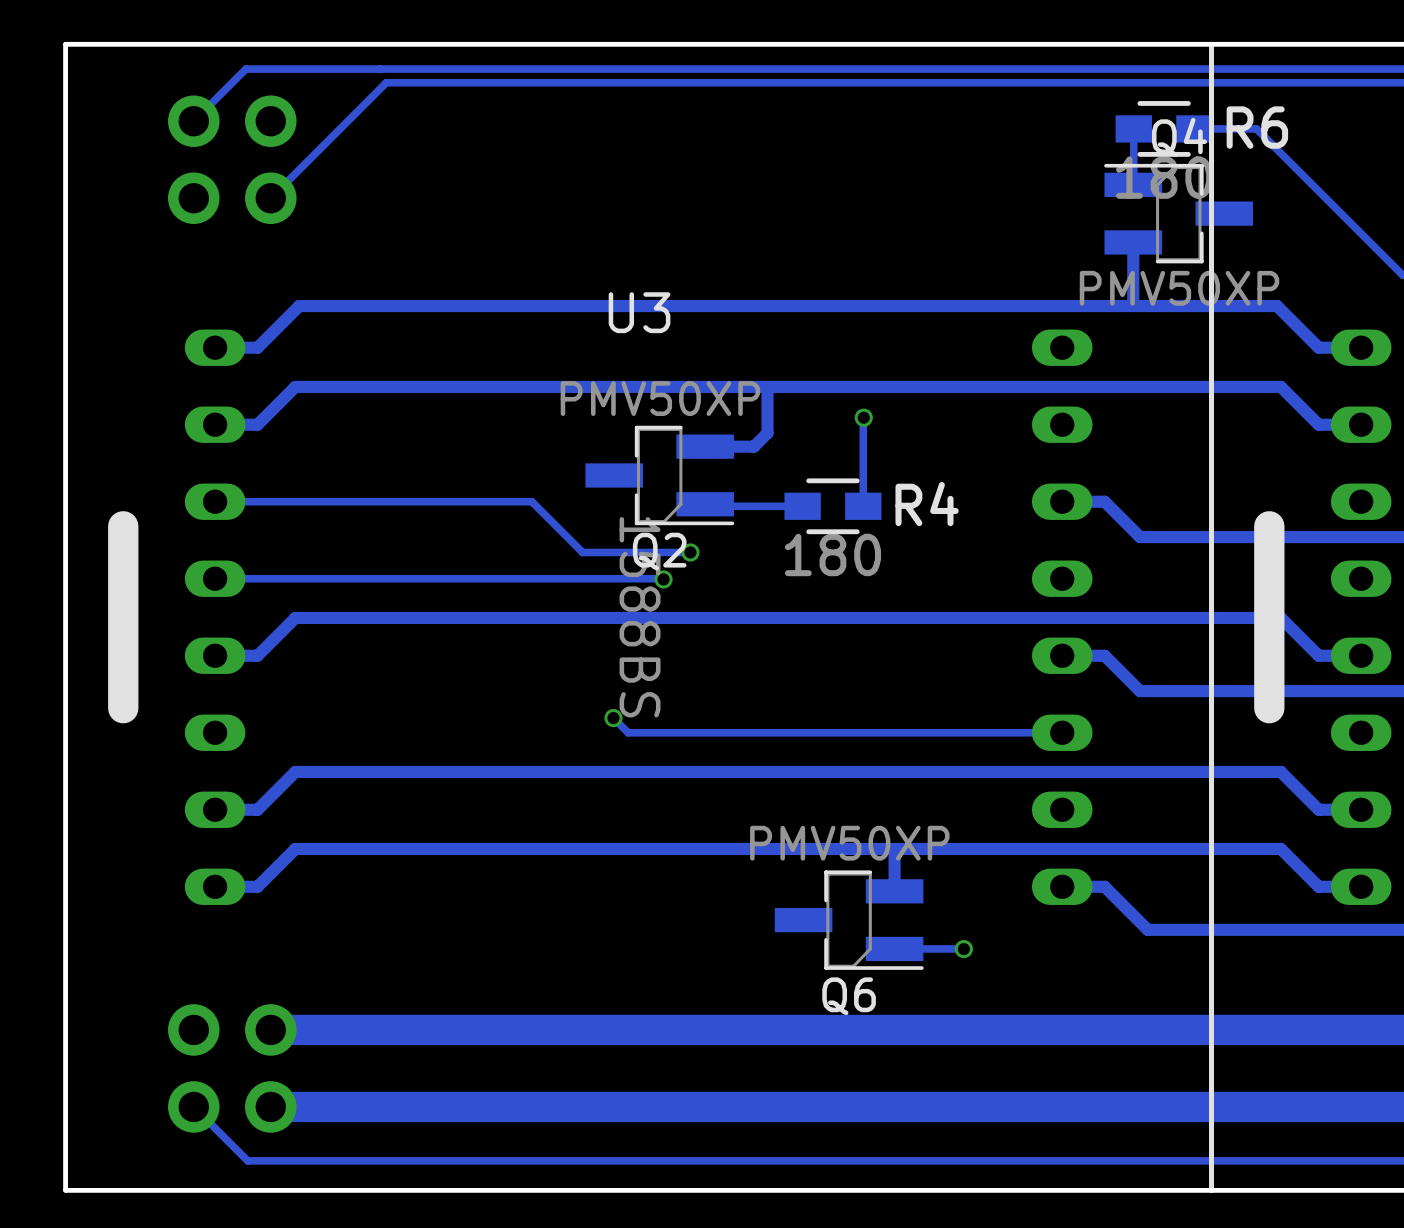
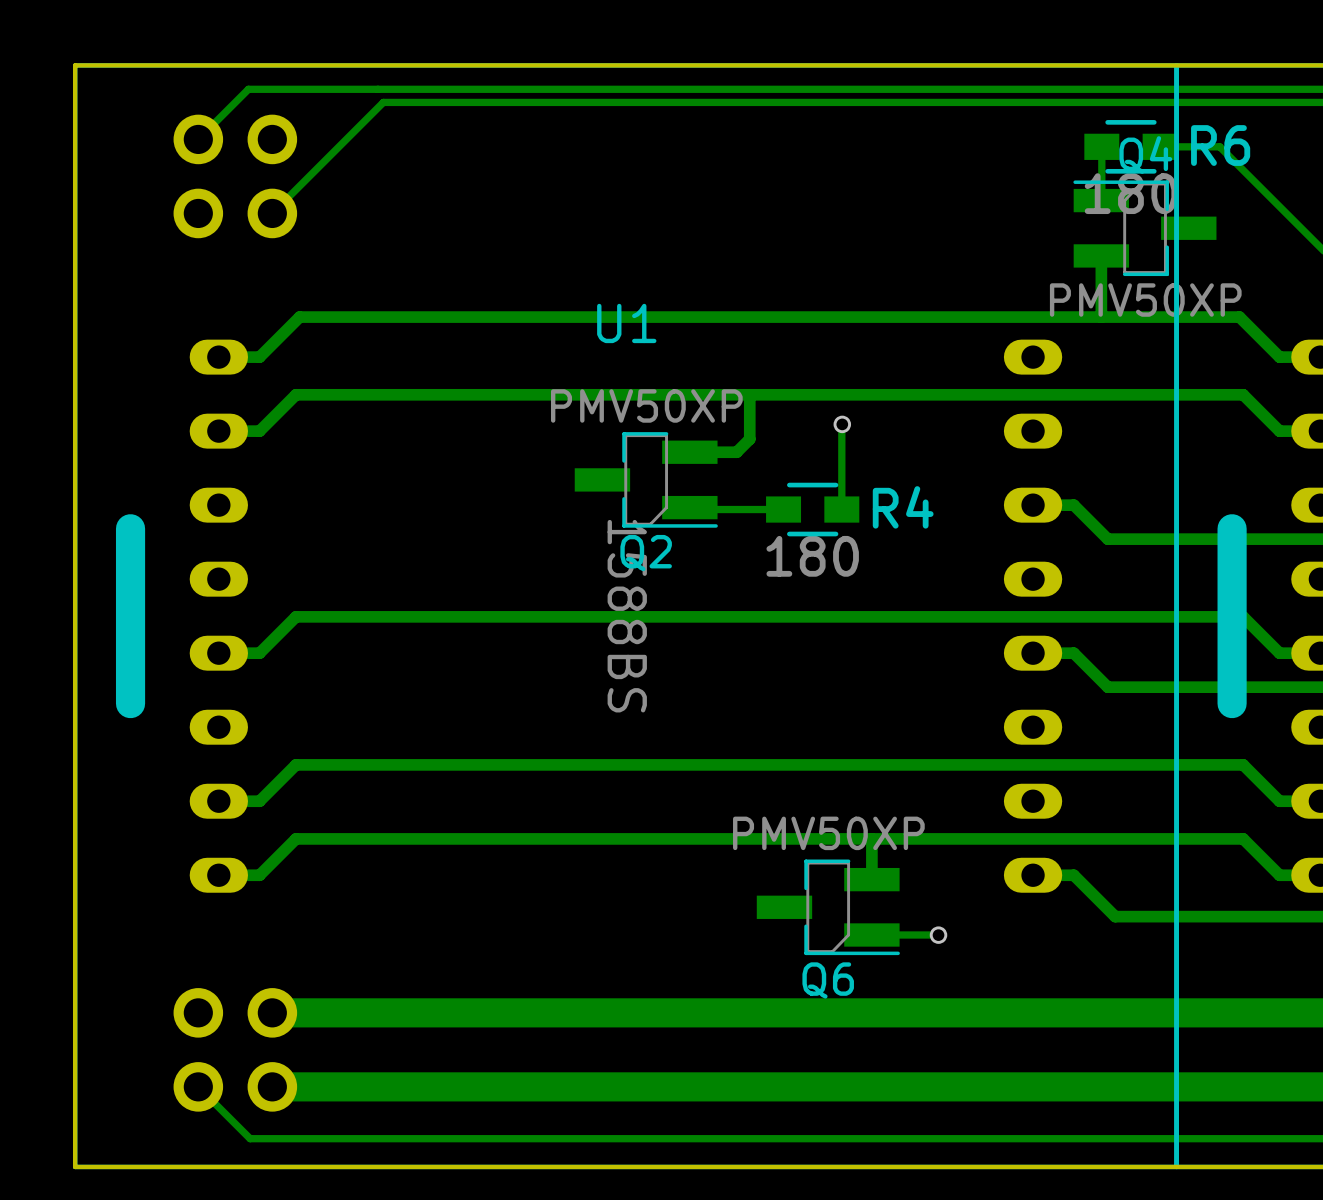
U3 name: U3 (639, 312) -> U1 (626, 323)
track: (215, 501) (531, 501) (582, 552) (690, 552) -> none
via: (690, 552) -> none
track: (215, 578) (663, 579) -> none
via: (663, 579) -> none
track: (613, 718) (628, 732) (1062, 732) -> none
via: (613, 718) -> none

